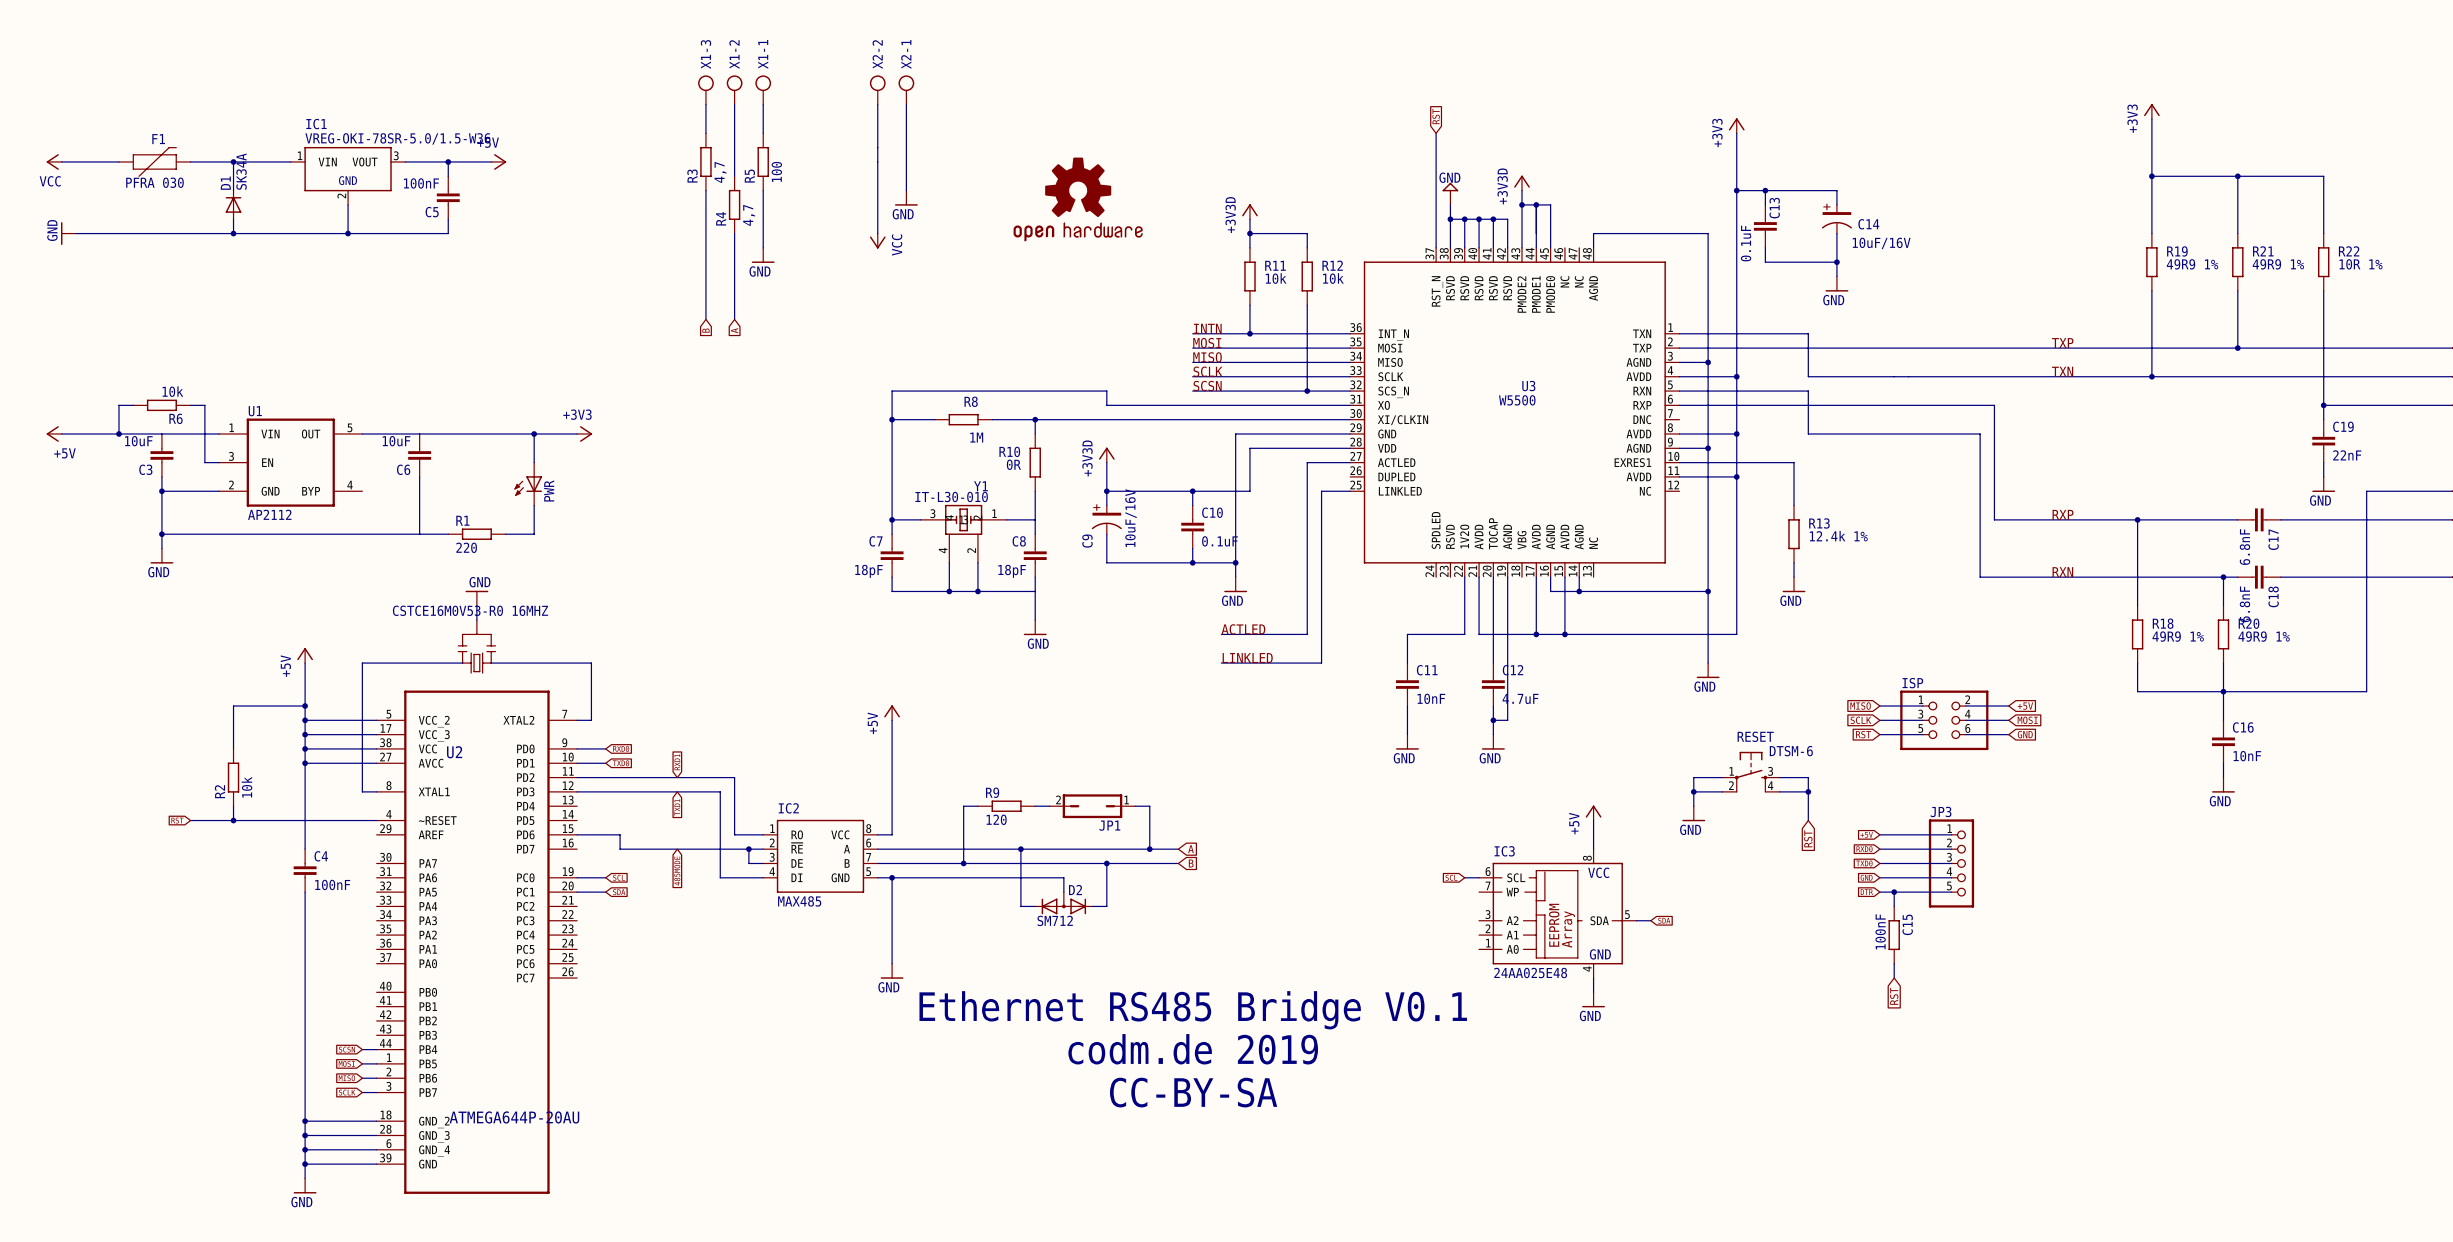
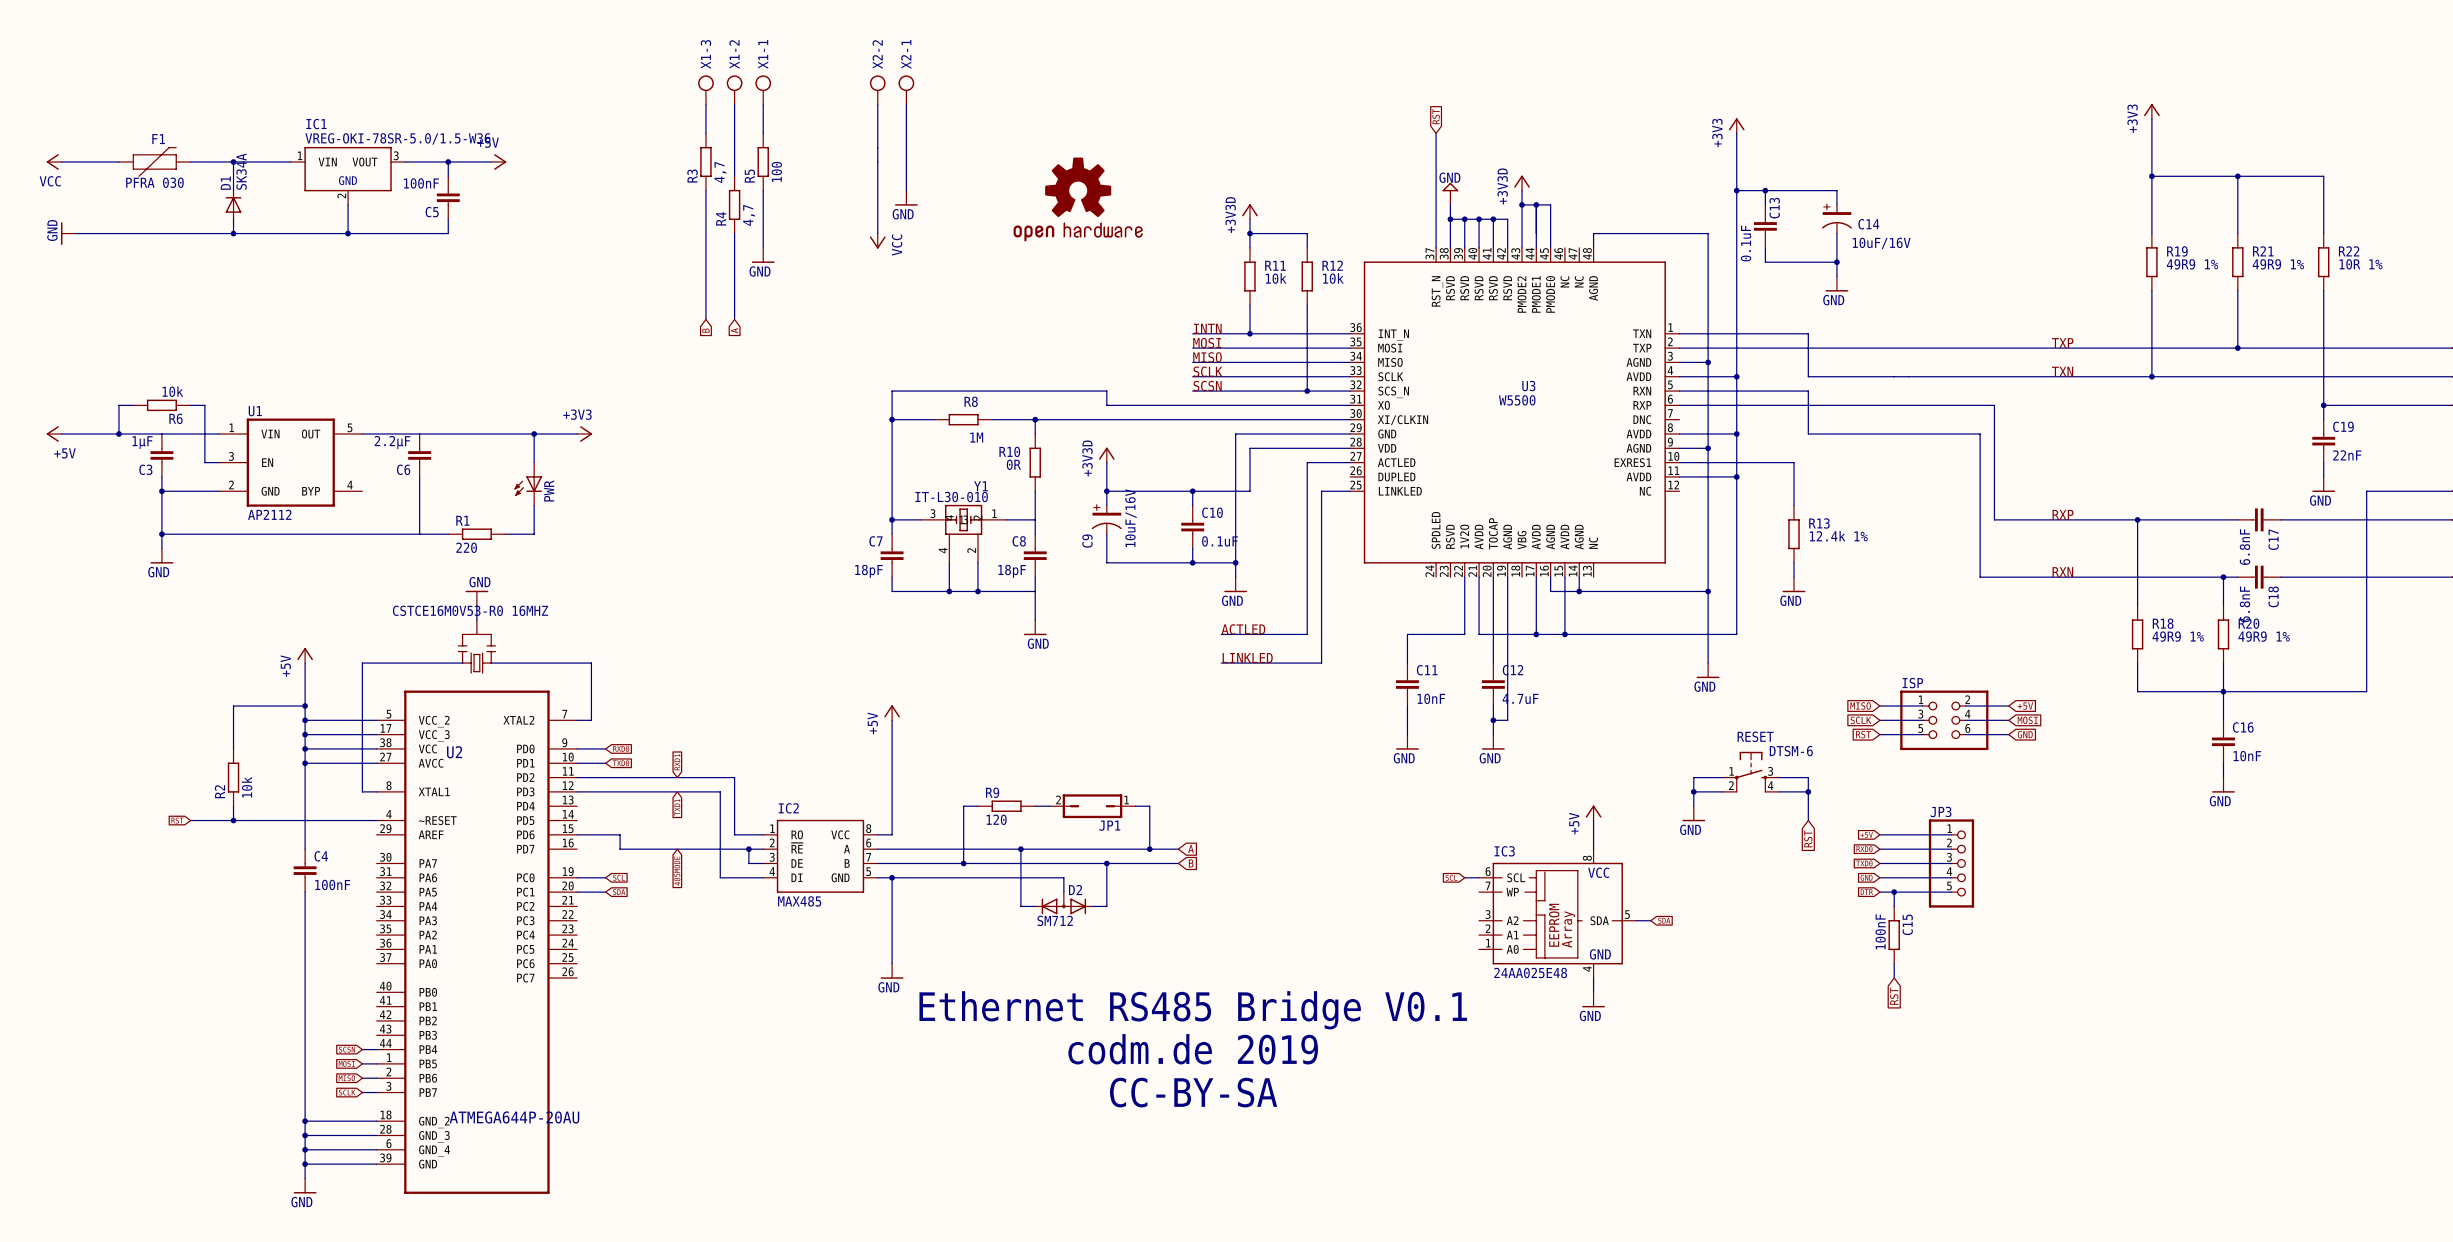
C3 value: 10uF (138, 441) -> 1µF (142, 442)
C6 value: 10uF (396, 441) -> 2.2µF (392, 442)

